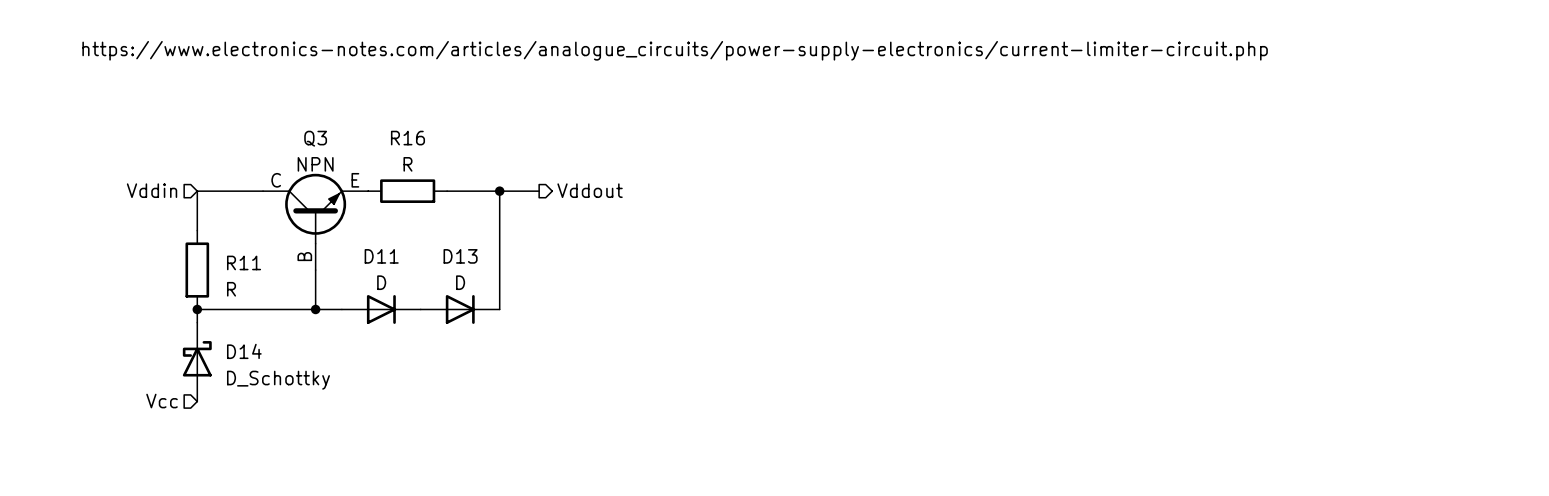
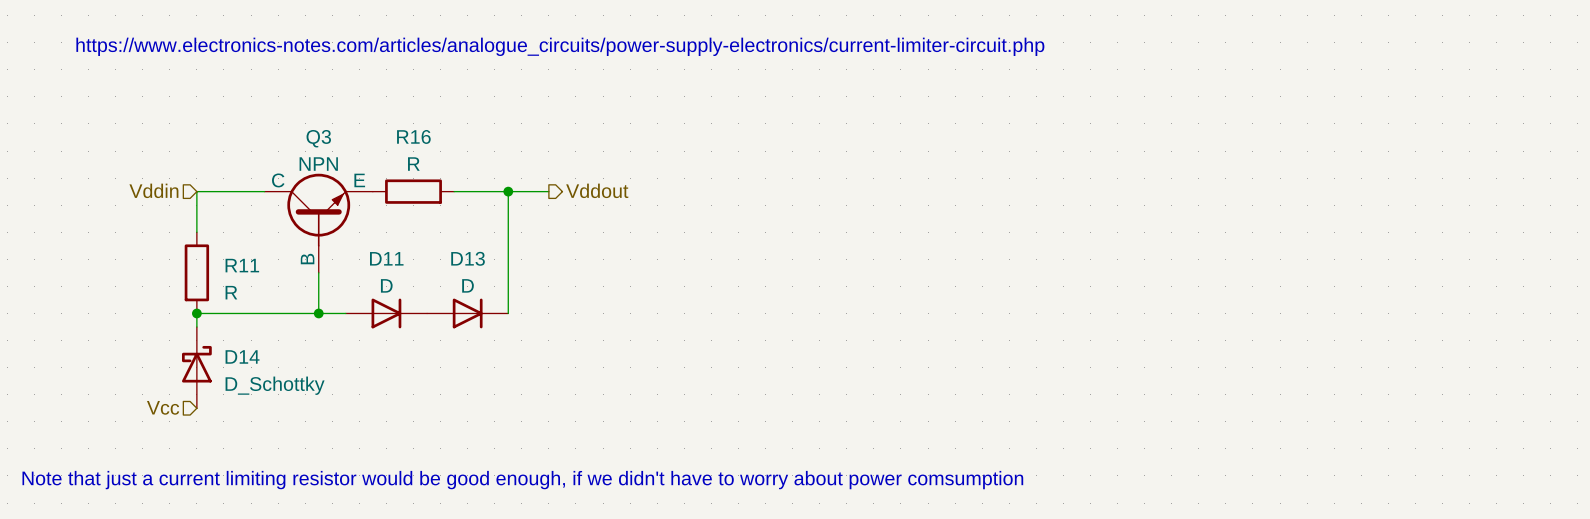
text: none -> Note that just a current limiting resistor would be good enough, if we didn't have to worry about power comsumption (522, 480)

